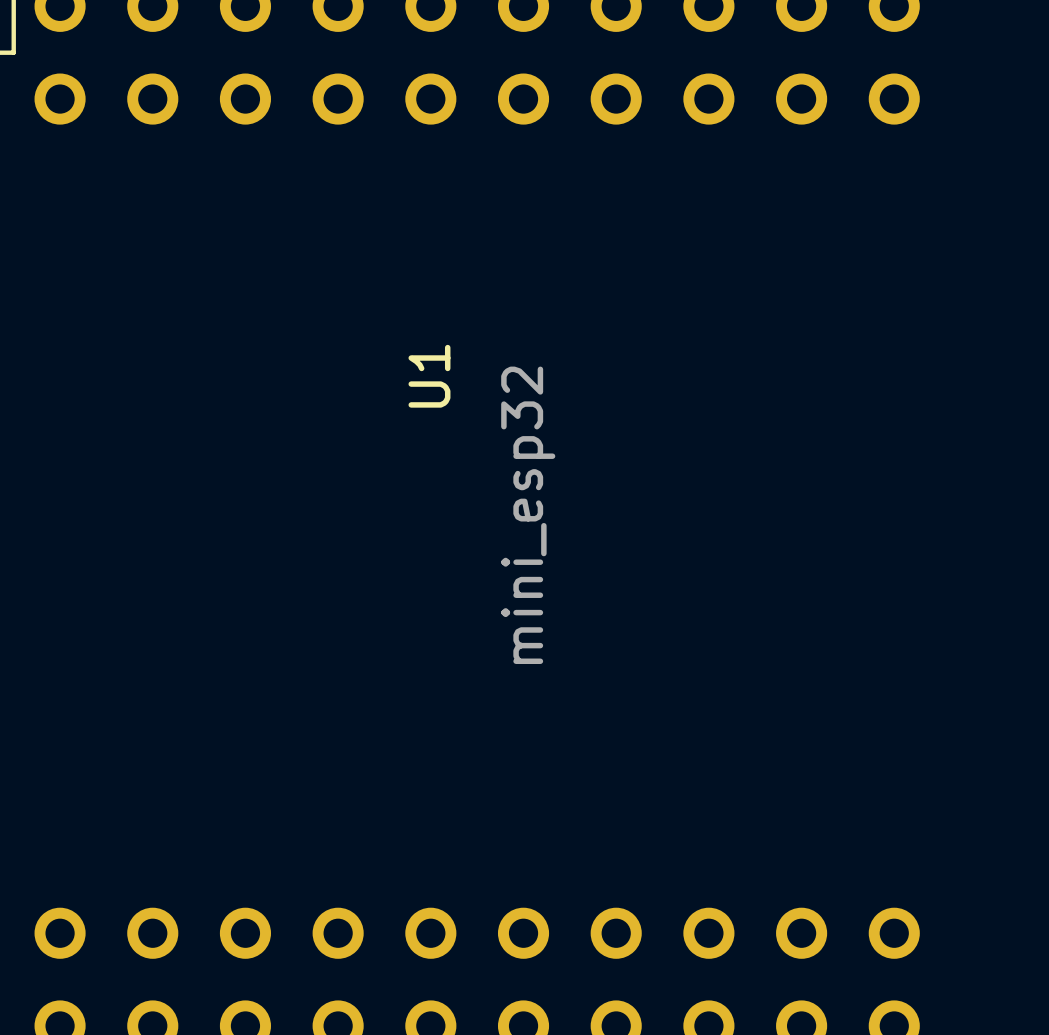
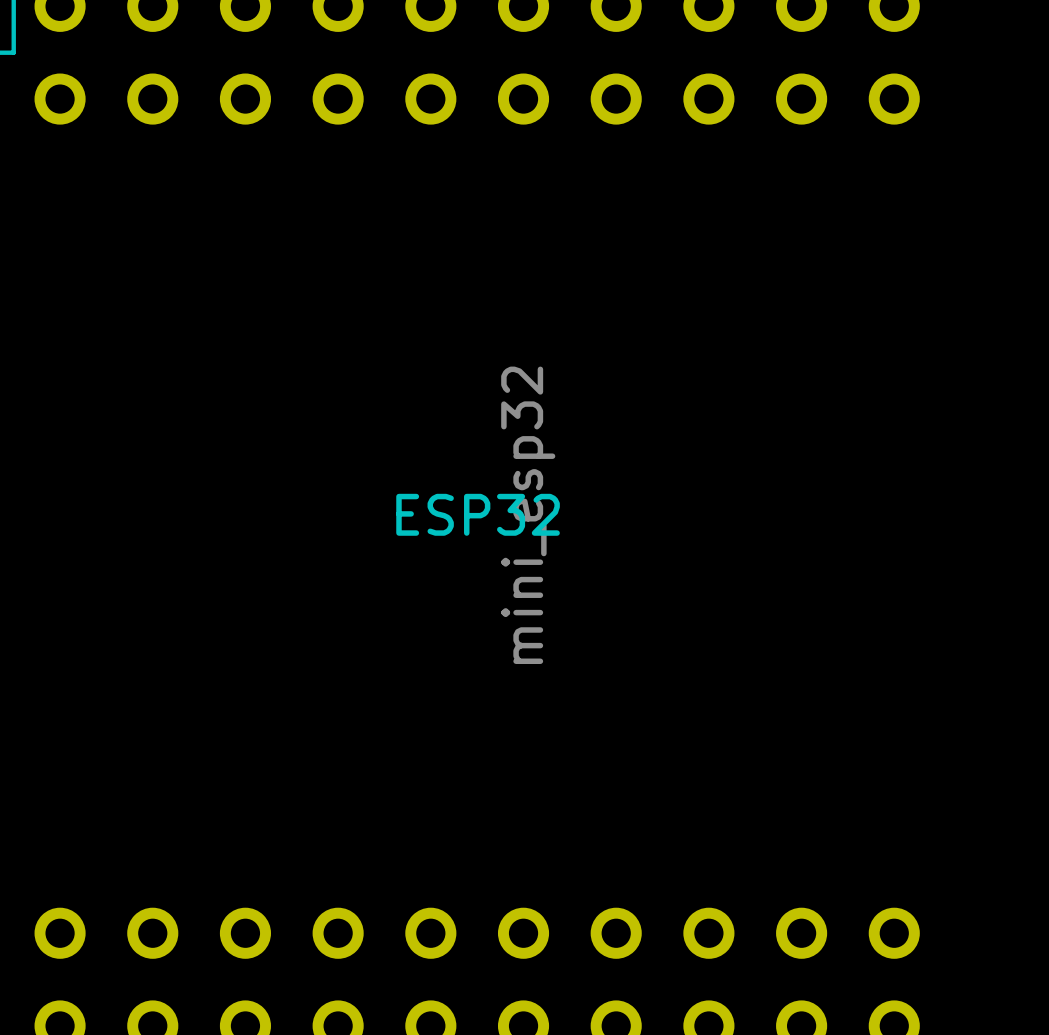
U1 name: U1 (429, 376) -> ESP32 (478, 514)

